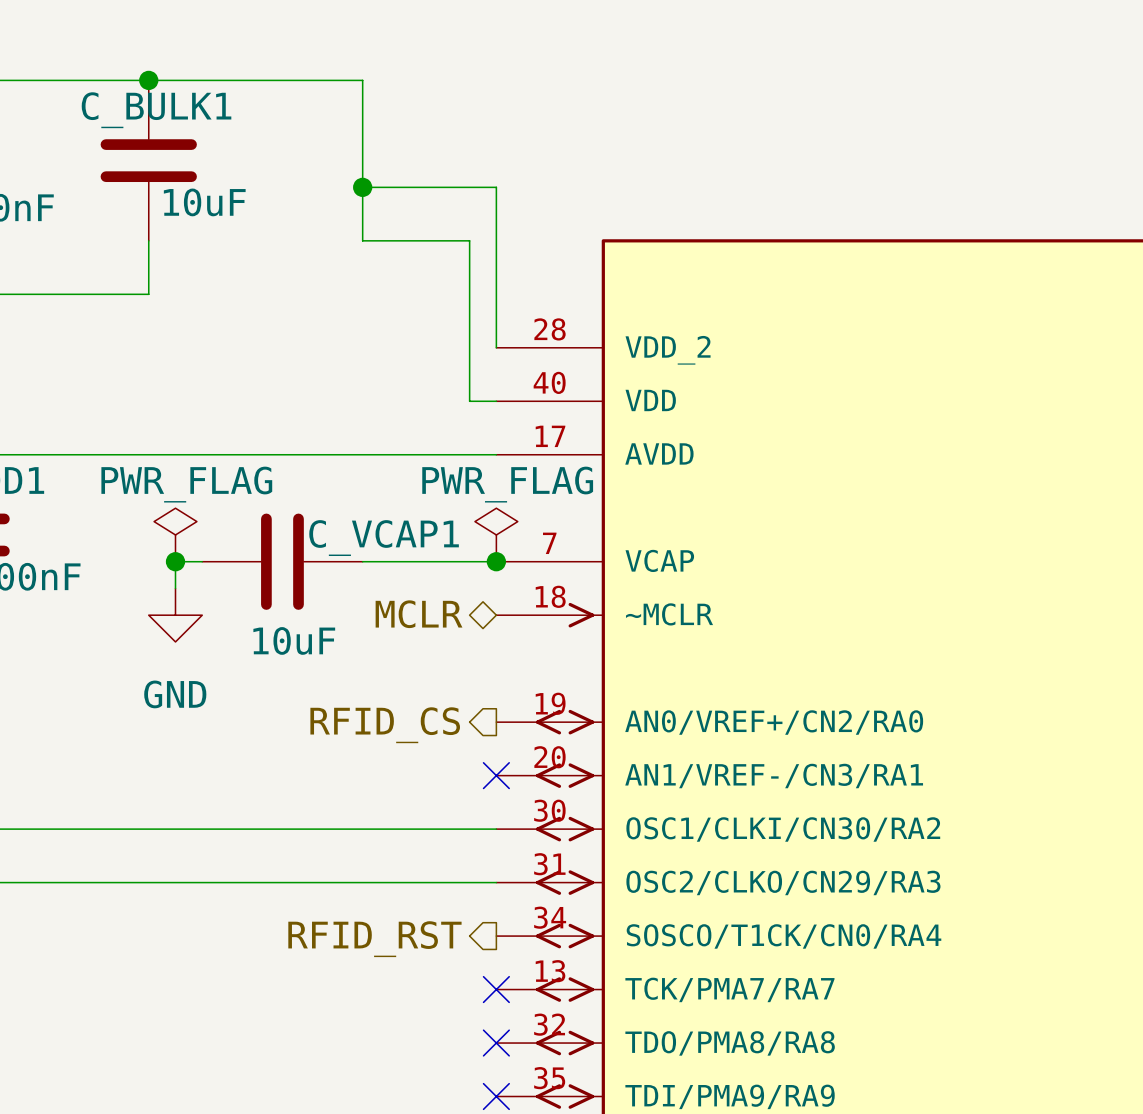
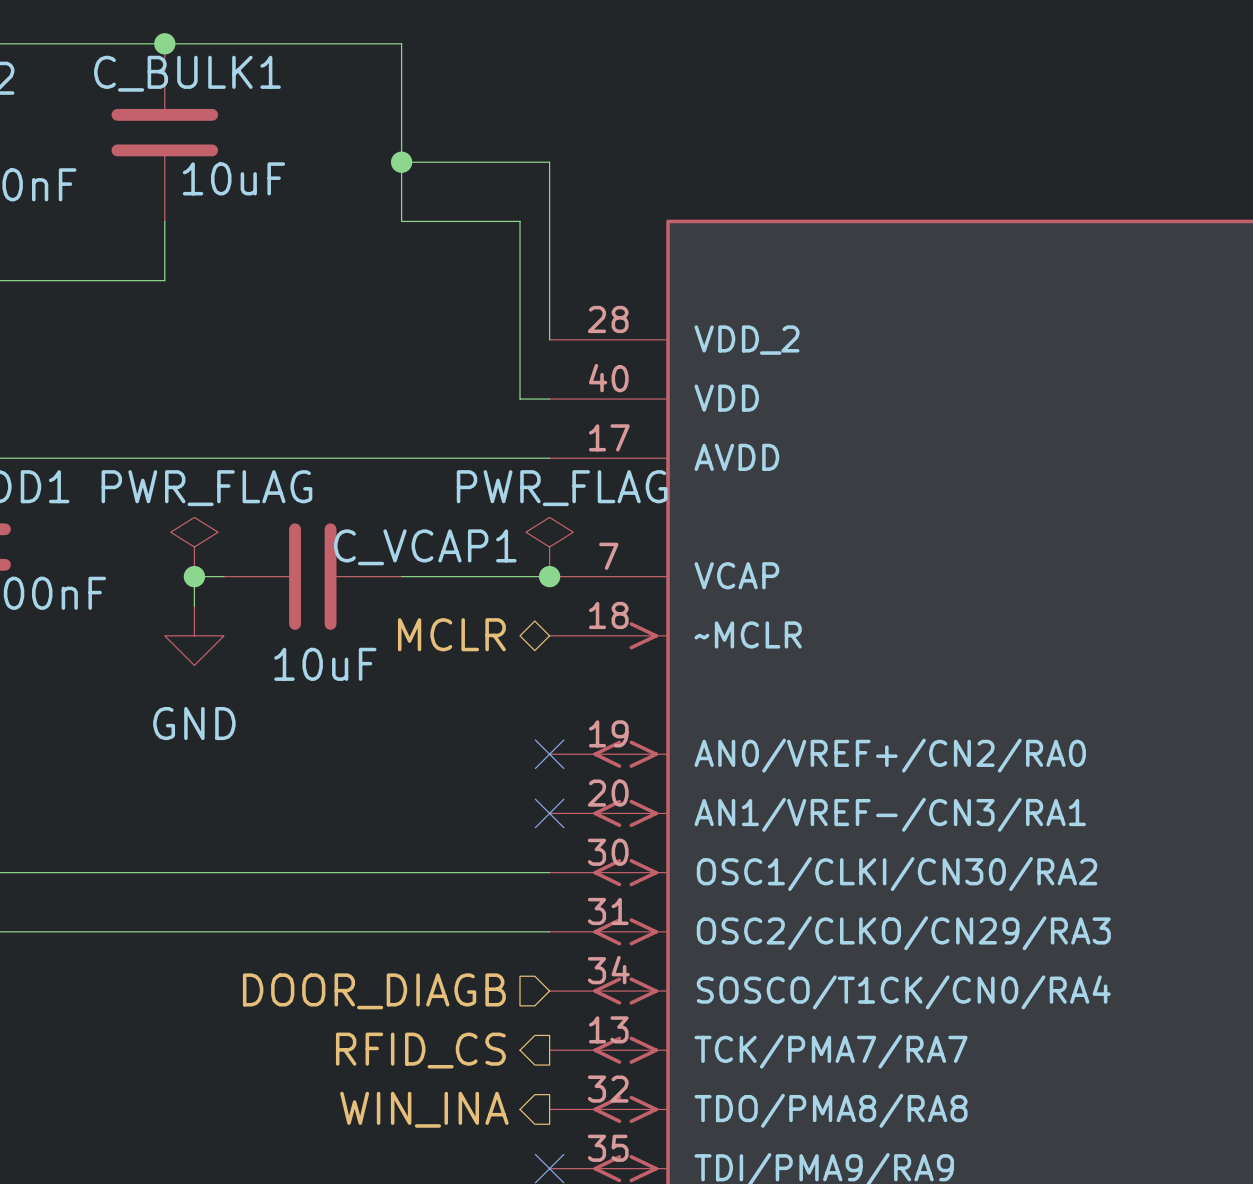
no-connect mark: none -> (549, 754)
hierarchical label position: RFID_CS (385, 725) -> RFID_CS (420, 1050)
hierarchical label shape: output (374, 939) -> input (374, 991)
hierarchical label: RFID_RST (374, 939) -> DOOR_DIAGB (374, 991)
no-connect mark: (496, 989) -> none
no-connect mark: (496, 1043) -> none
hierarchical label: none -> WIN_INA (424, 1109)

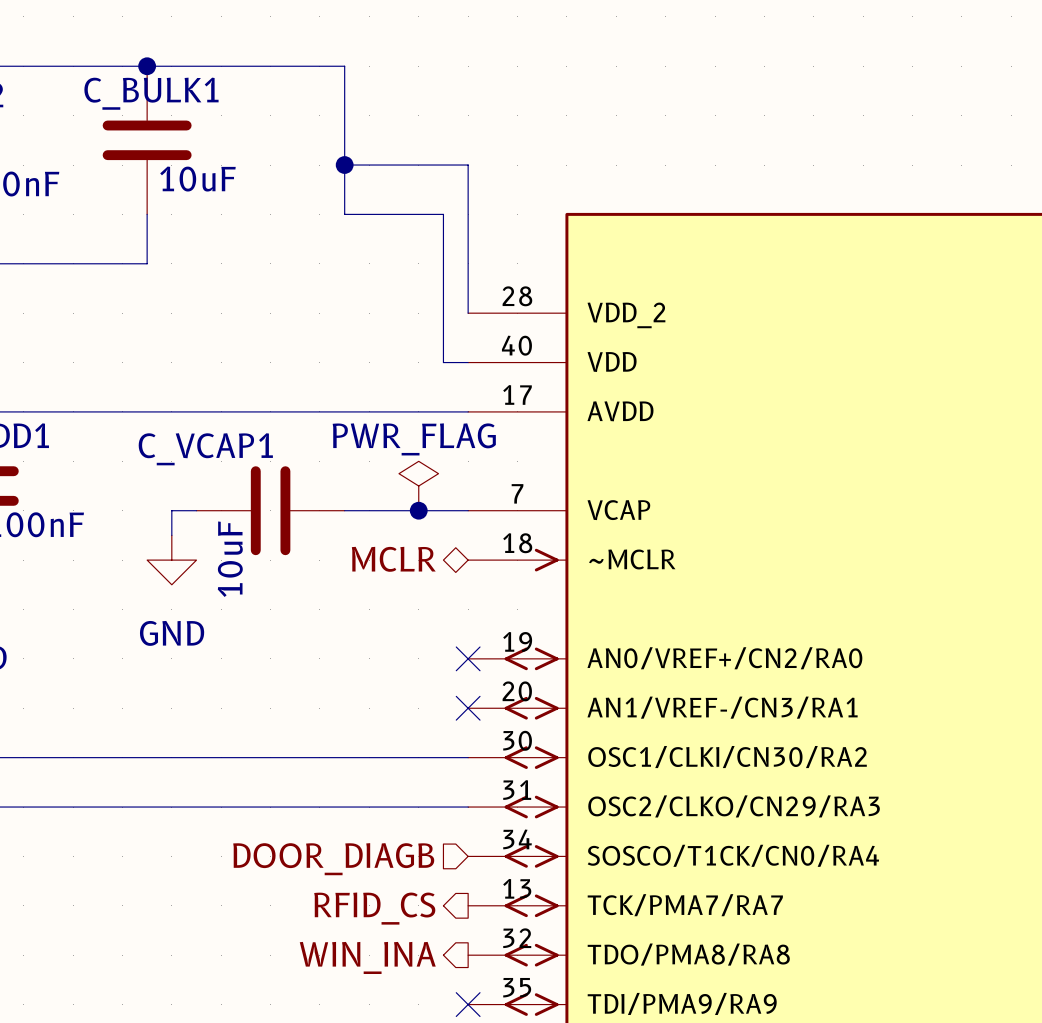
power symbol text position: PWR_FLAG (562, 488) -> PWR_FLAG (414, 439)
power symbol: PWR_FLAG (194, 547) -> none
C_VCAP1 name position: C_VCAP1 (425, 547) -> C_VCAP1 (205, 449)
power symbol position: PWR_FLAG (549, 547) -> PWR_FLAG (418, 486)
junction: (194, 576) -> none
junction position: (549, 576) -> (418, 510)
C_VCAP1 value rotation: 0° (325, 664) -> 90° counterclockwise (230, 559)

